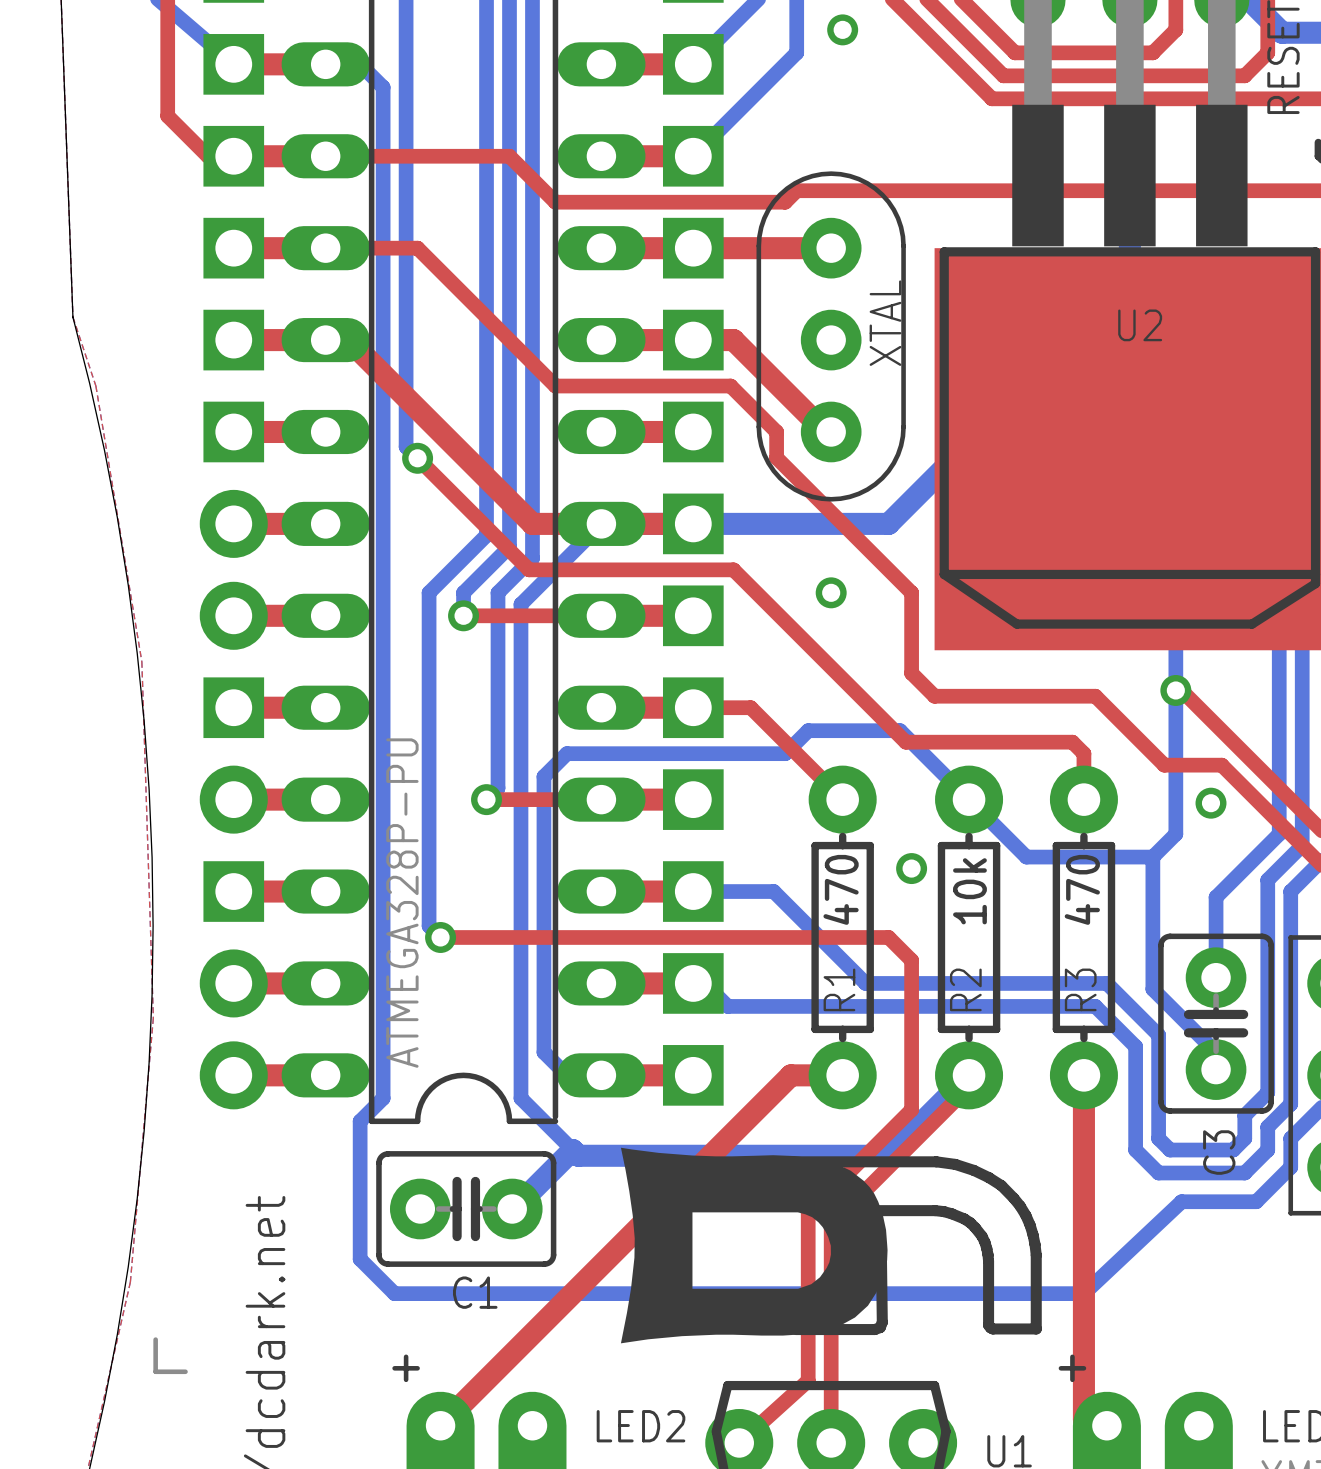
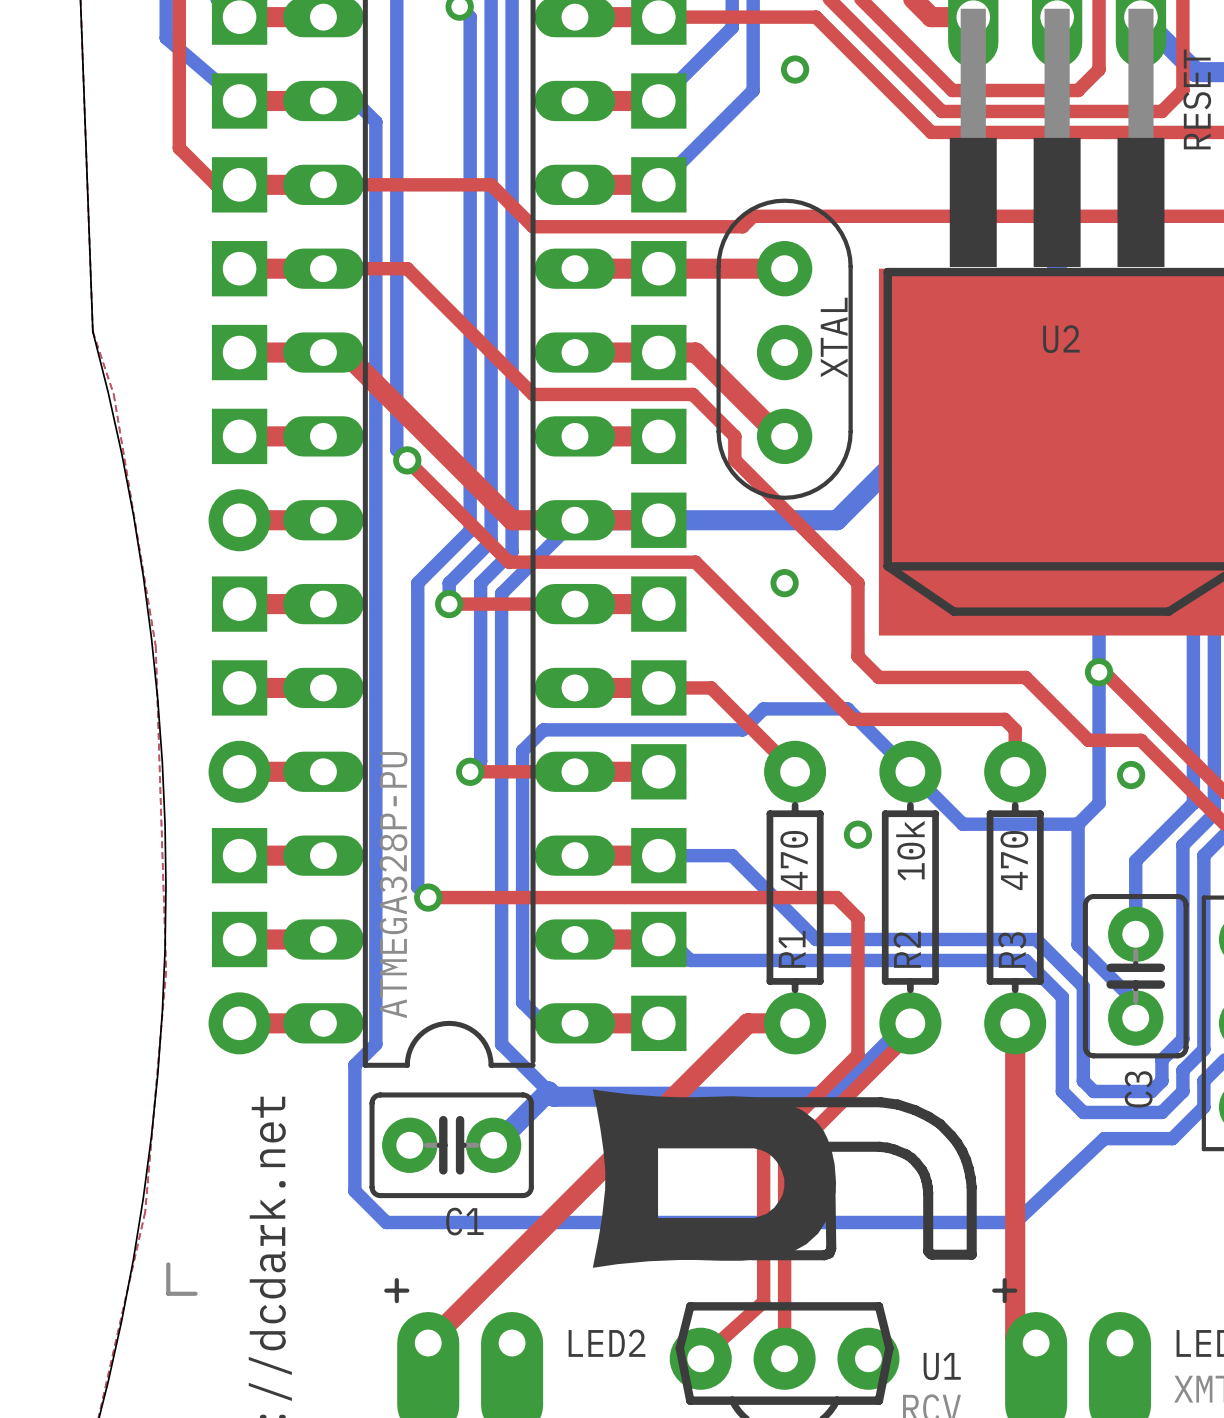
part footprint: [199, 581, 268, 650] -> [211, 576, 268, 632]
part footprint: [199, 949, 268, 1018] -> [211, 911, 268, 968]

